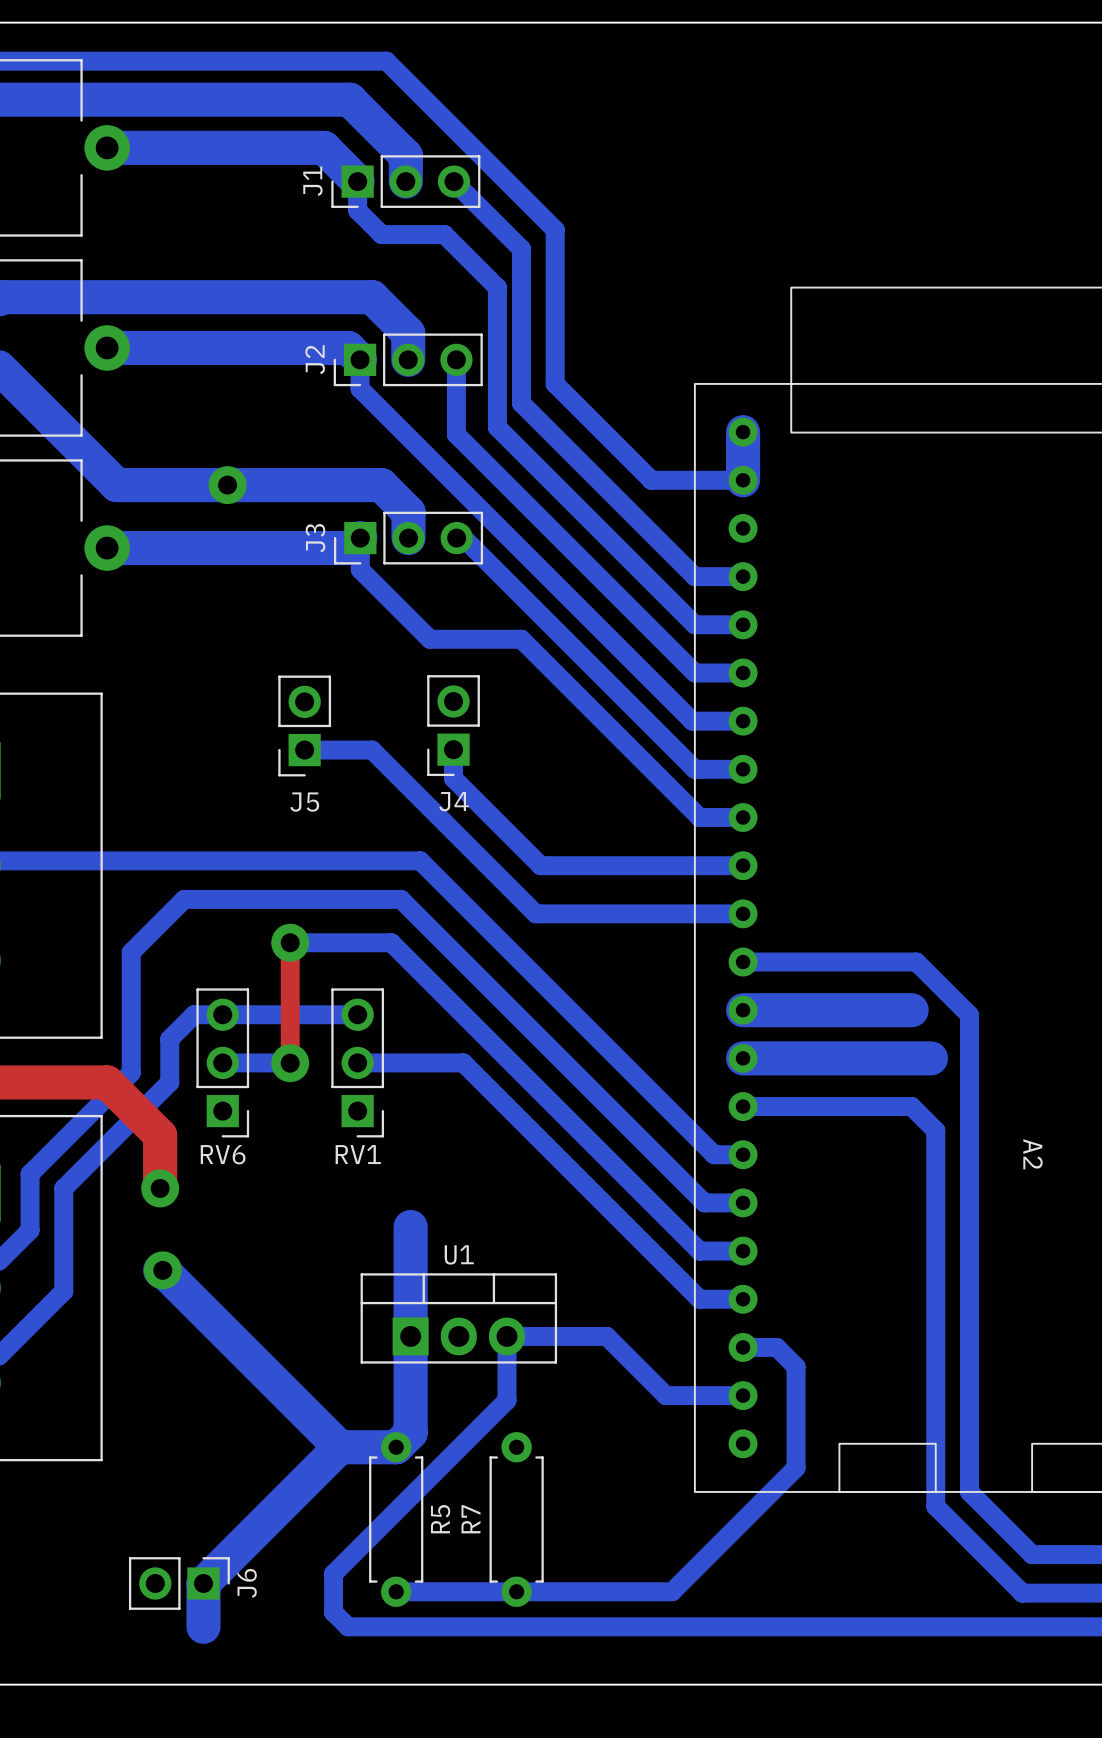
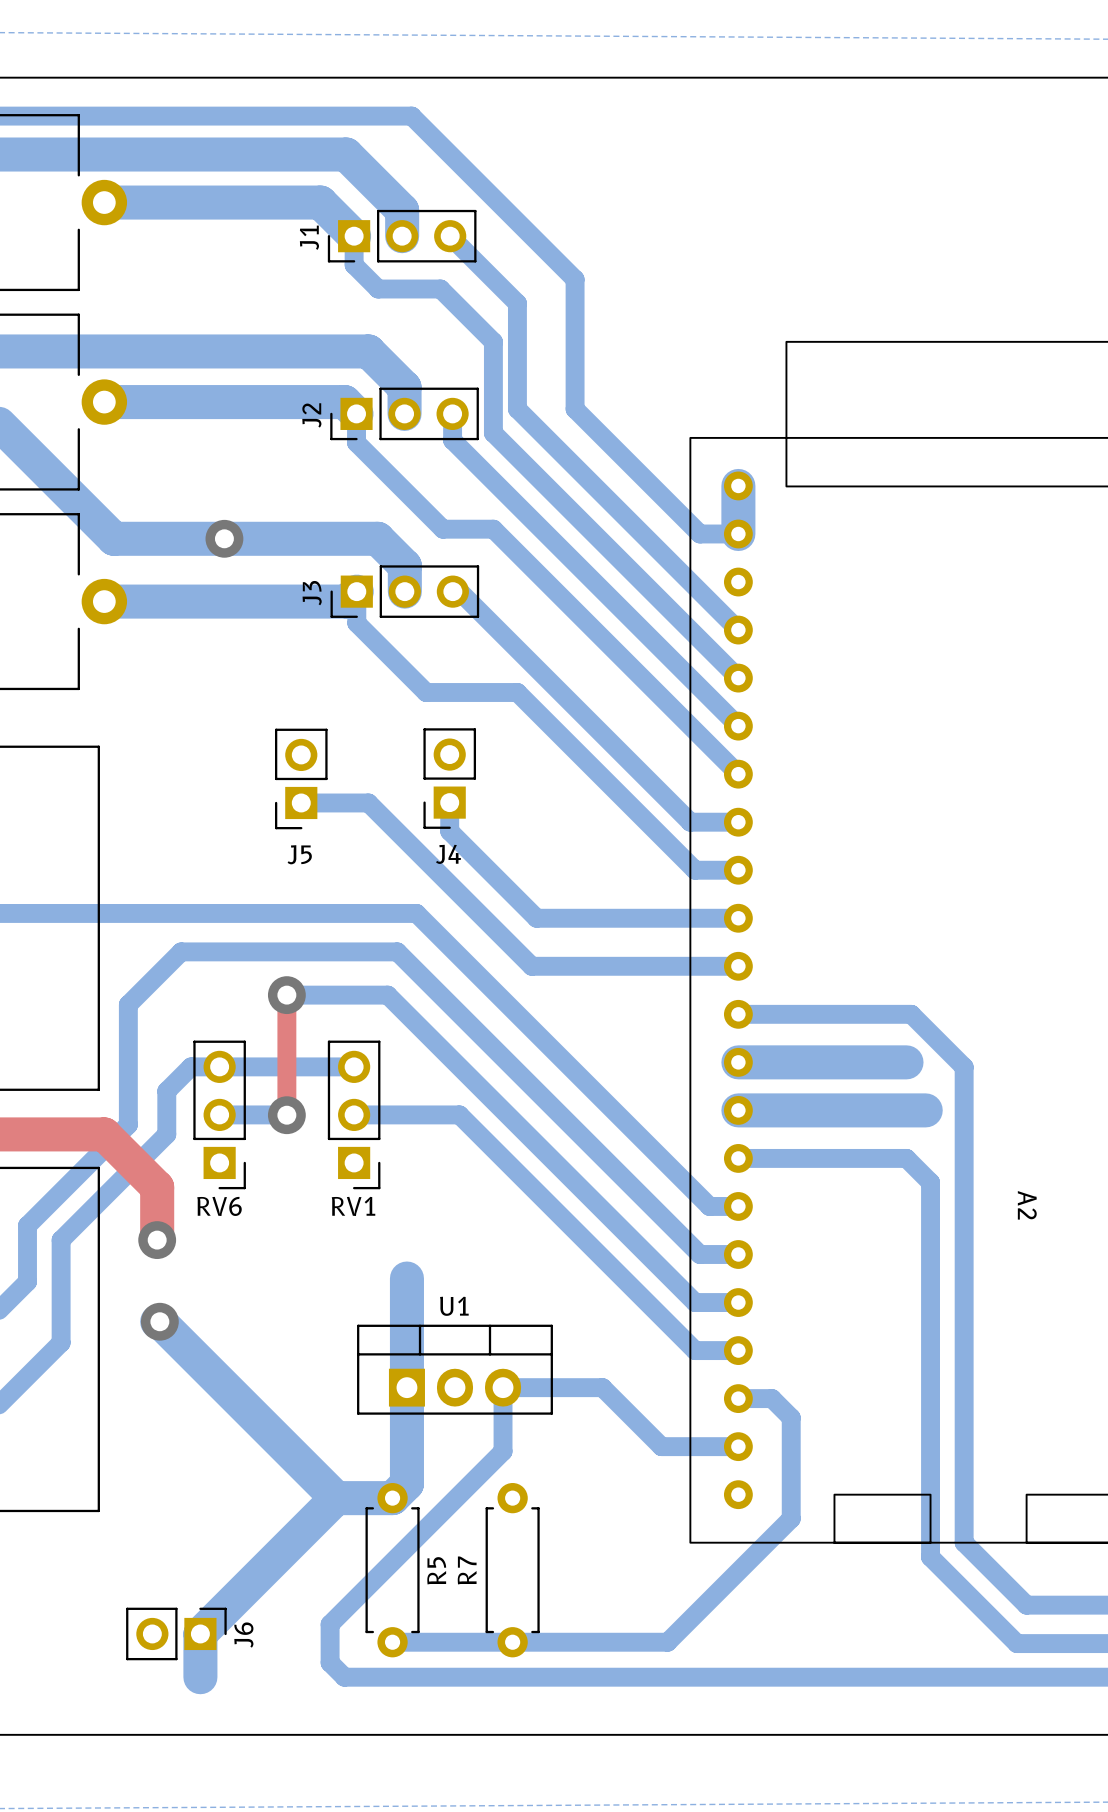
bottom track: (386, 61) (555, 229) (555, 383) (651, 480) (704, 480) -> (382, 116) (411, 116) (575, 279) (575, 409) (699, 533)
bottom track: (521, 355) (521, 403) -> (517, 409) (738, 630)
bottom track: (497, 379) (497, 427) -> (493, 433) (517, 457)
bottom track: (456, 386) (456, 434) (497, 475) -> (452, 440) (493, 481)
bottom track: (446, 475) (692, 721) (743, 721) -> (442, 529) (493, 529)
bottom track: (694, 576) (743, 576) -> (690, 630) (738, 678)
bottom track: (694, 624) (743, 624) -> (690, 678) (738, 726)
bottom track: (694, 672) (743, 672) -> (690, 726) (738, 774)

